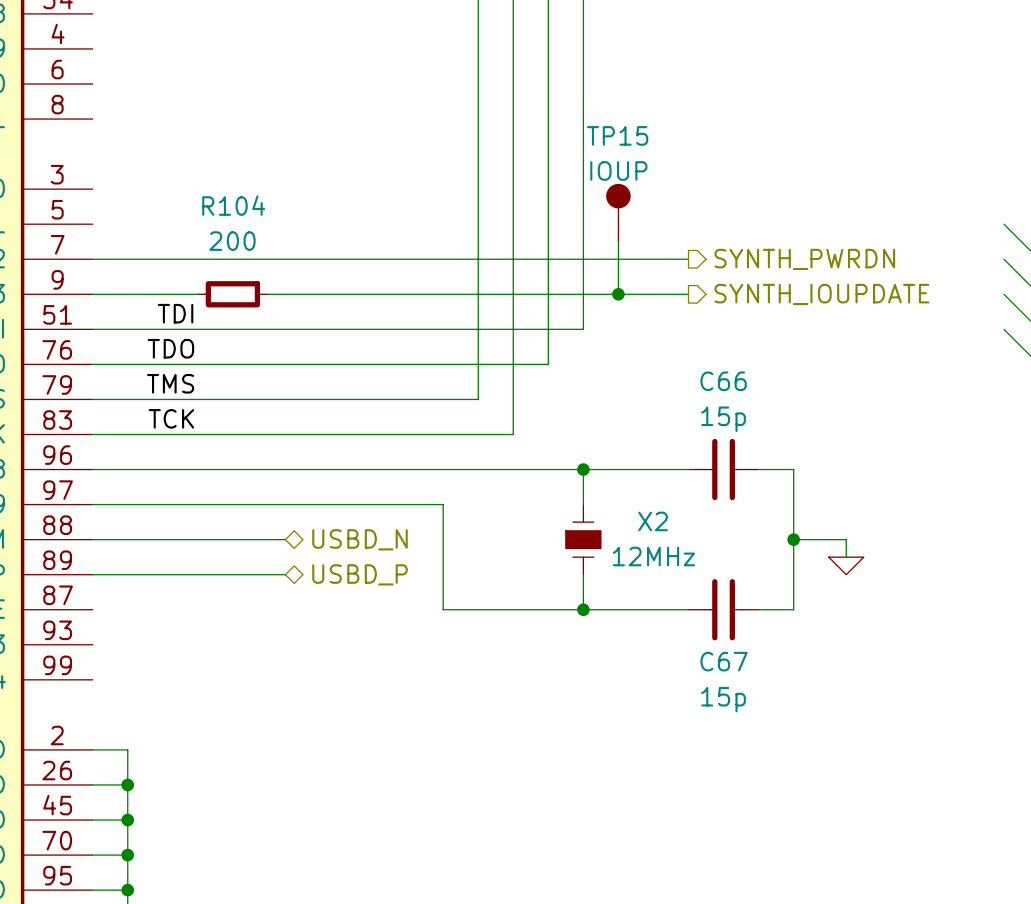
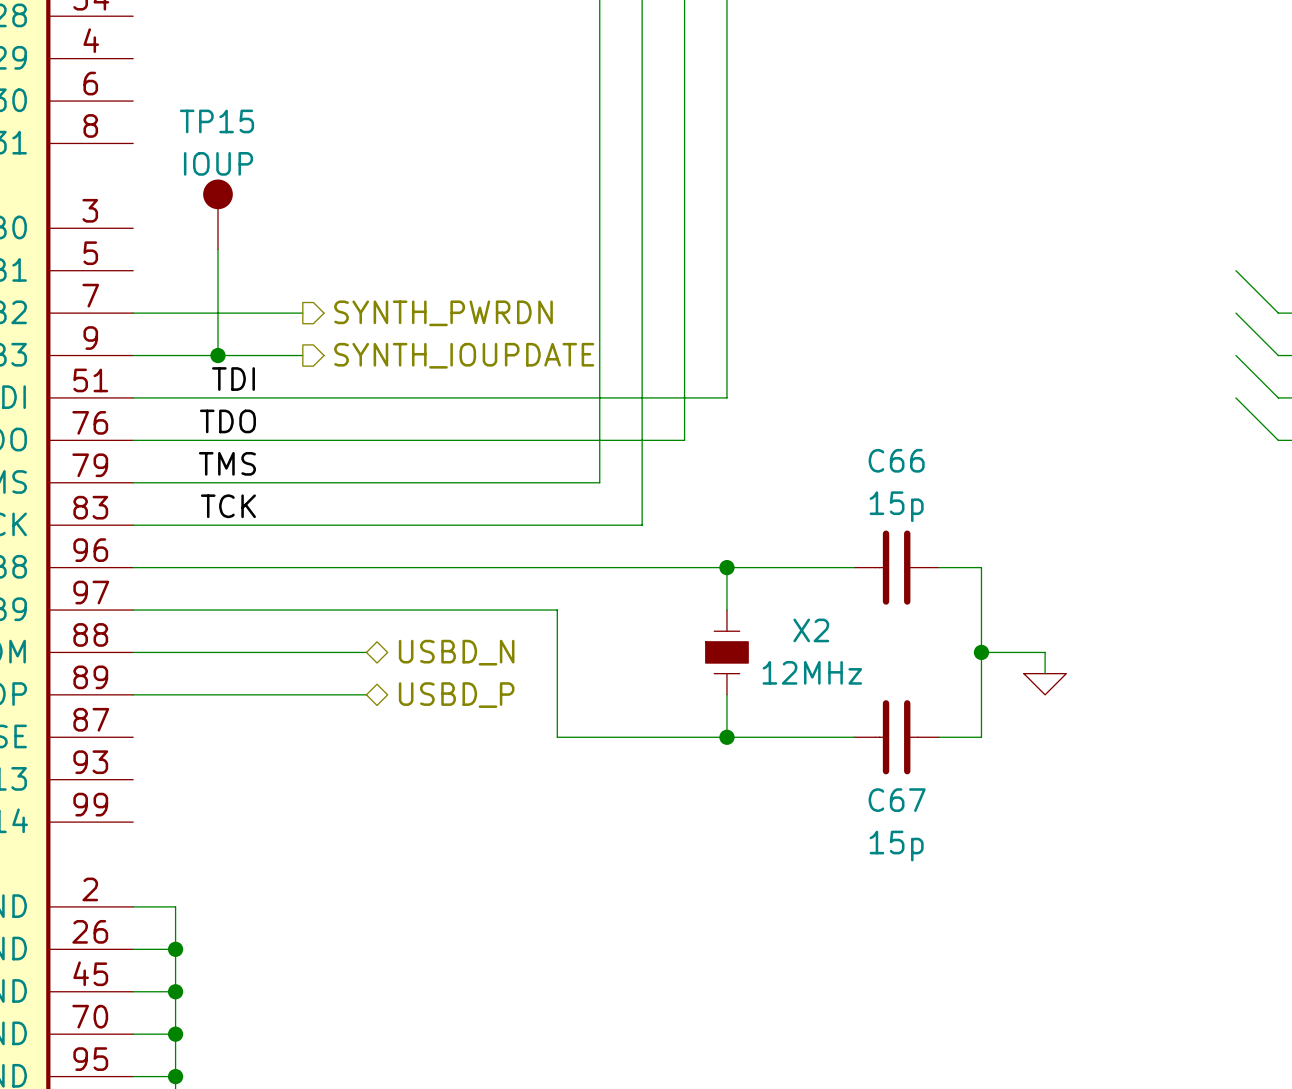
wire: none -> (217, 249) (217, 355)
TP15 position: (618, 212) -> (217, 214)
wire: (618, 241) (618, 294) -> none
wire: (232, 259) (688, 259) -> none
hierarchical label: none -> SYNTH_PWRDN (443, 313)
hierarchical label: SYNTH_PWRDN (804, 259) -> none
junction: none -> (217, 355)
wire: none -> (260, 355) (302, 355)
R104: 200 (232, 294) -> none
wire: (267, 294) (688, 294) -> none
hierarchical label: none -> SYNTH_IOUPDATE (464, 355)
junction: (618, 294) -> none
hierarchical label: SYNTH_IOUPDATE (821, 294) -> none

